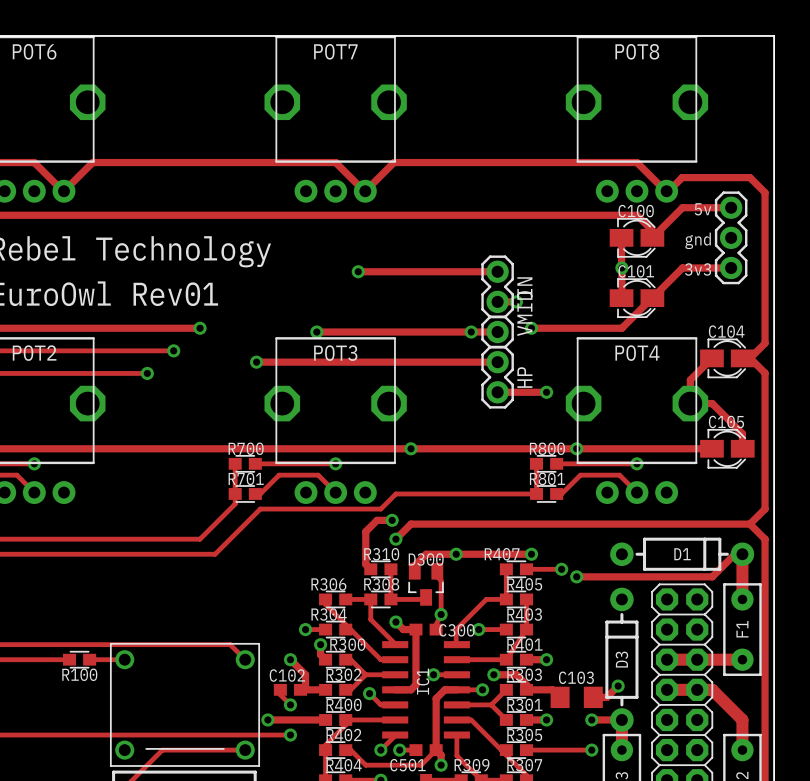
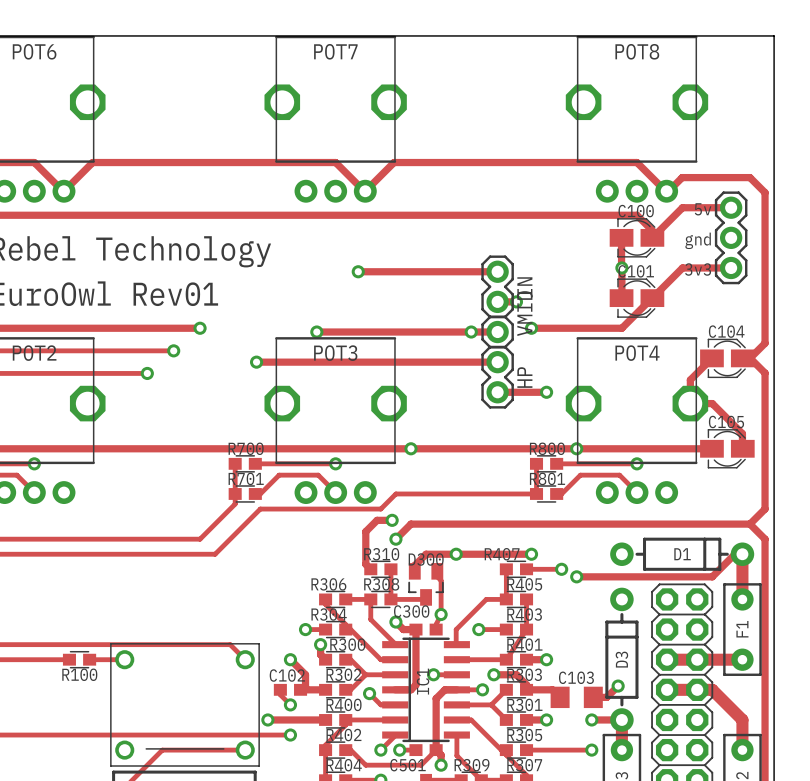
C300 name position: C300 (456, 630) -> C300 (411, 611)
IC1 footprint: [382, 641, 470, 739] -> [382, 637, 470, 743]

